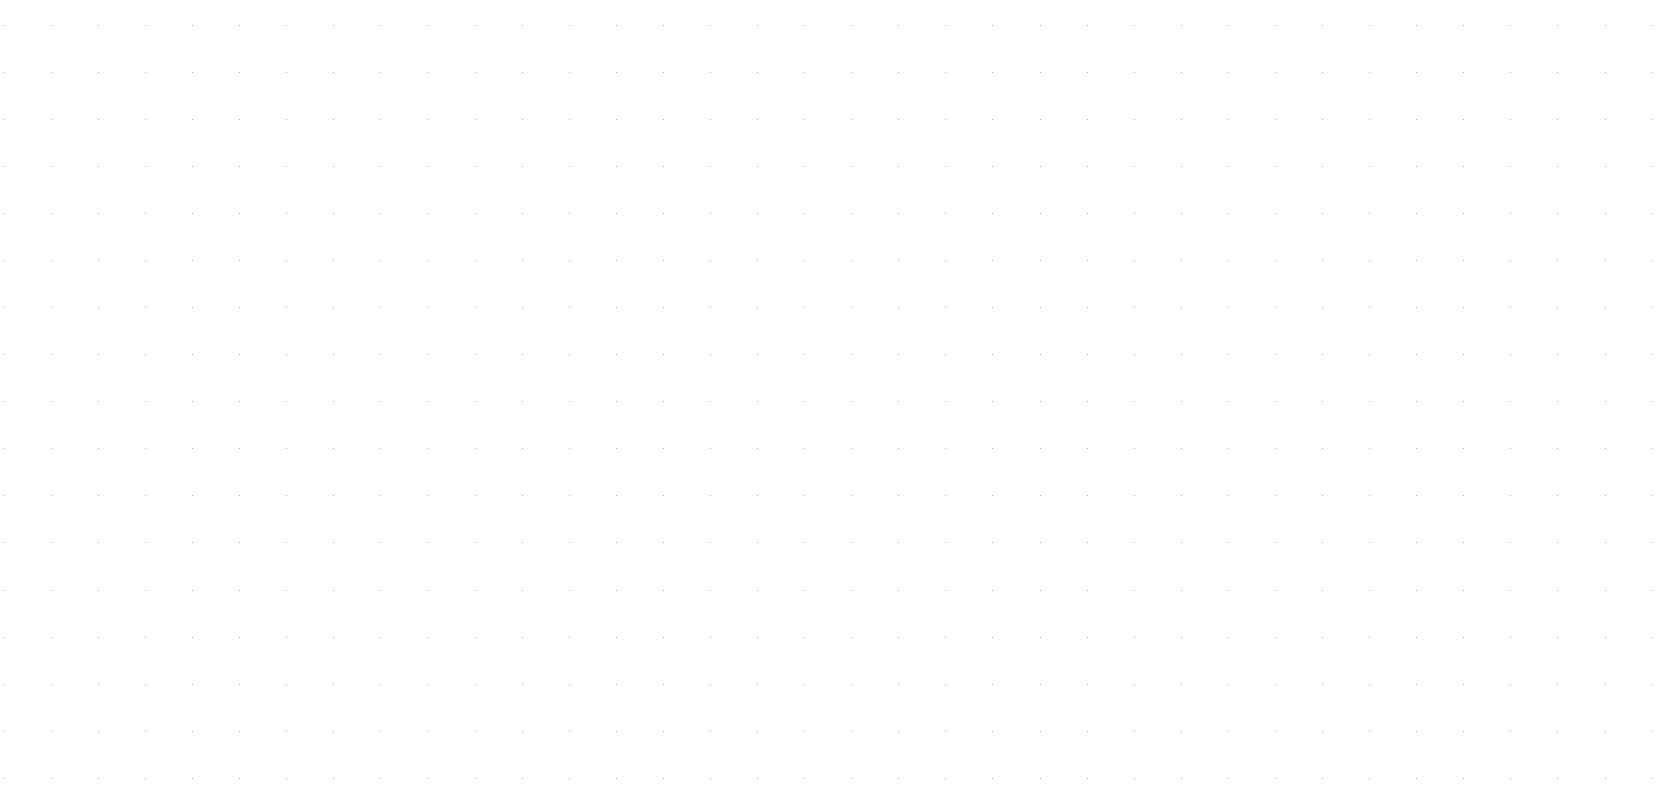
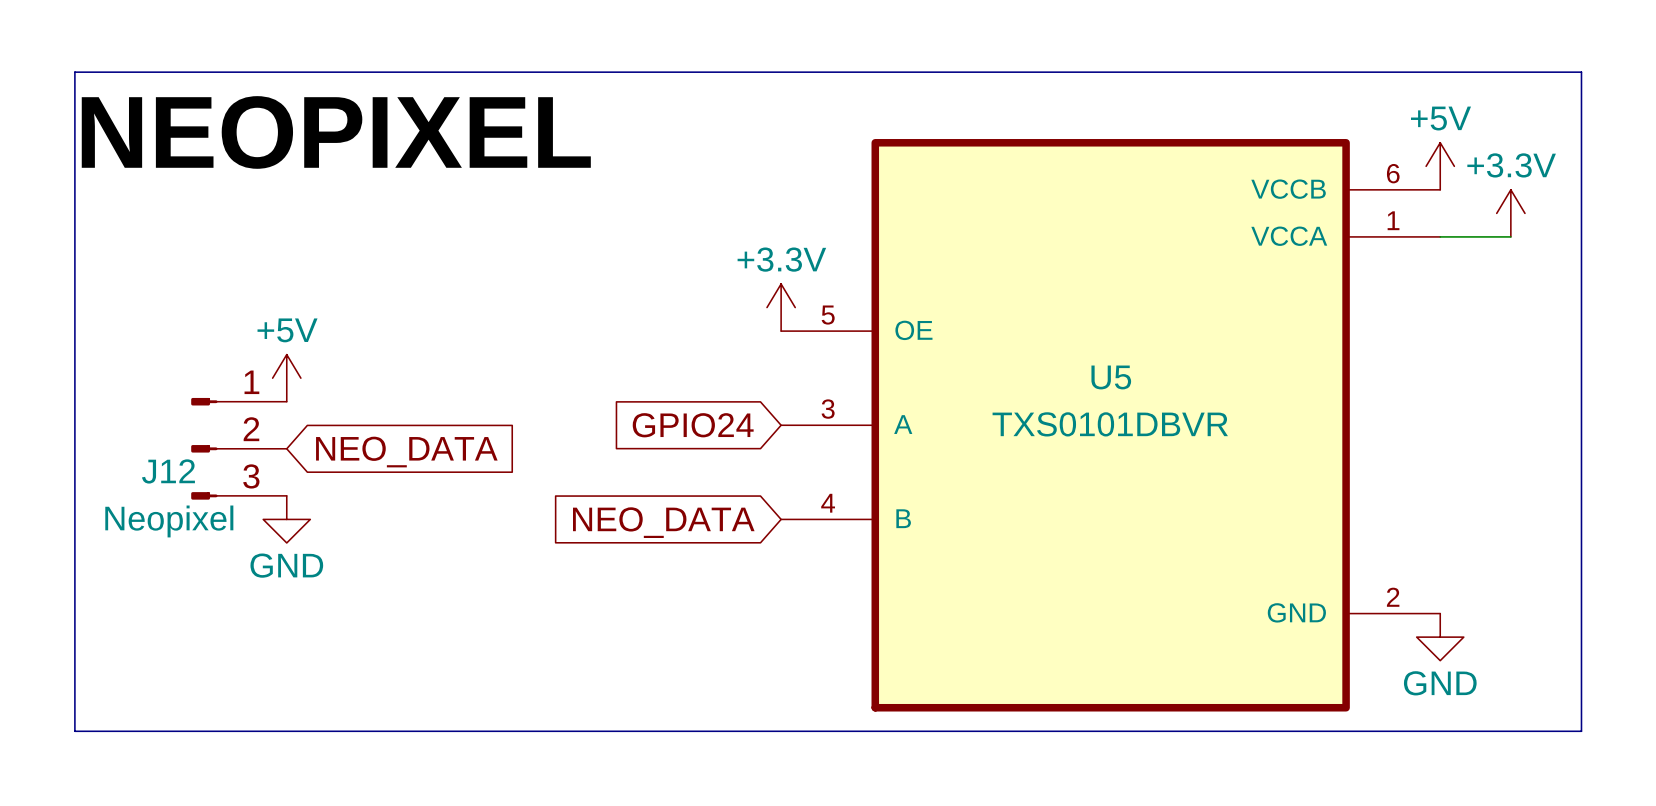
bus: none -> (74, 72) (1581, 72) (1581, 731) (74, 731) (74, 72)
label: none -> NEOPIXEL (336, 132)
power symbol: none -> +5V (1440, 166)
power symbol: none -> +3.3V (1510, 213)
wire: none -> (1440, 236) (1510, 236)
power symbol: none -> +3.3V (781, 307)
power symbol: none -> +5V (286, 378)
global label: none -> GPIO24 (693, 425)
U5: none -> TXS0101DBVR (1110, 425)
J12: none -> Neopixel (238, 448)
global label: none -> NEO_DATA (406, 452)
power symbol: none -> GND (286, 519)
global label: none -> NEO_DATA (663, 522)
power symbol: none -> GND (1440, 637)

